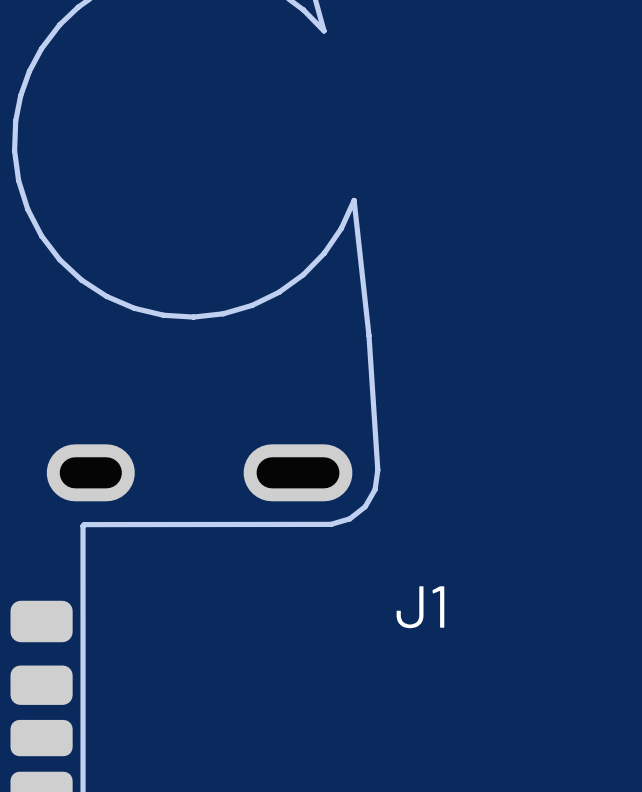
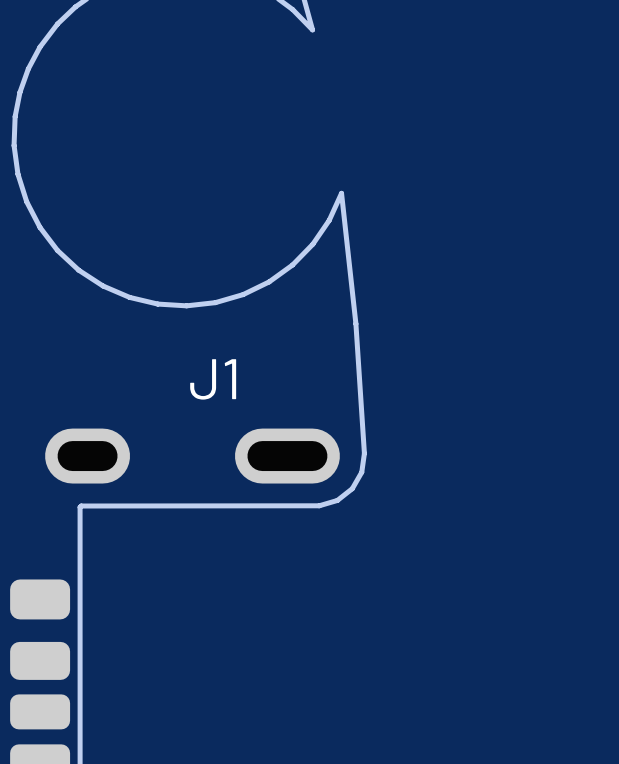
J1 name position: J1 (420, 607) -> J1 (213, 379)

